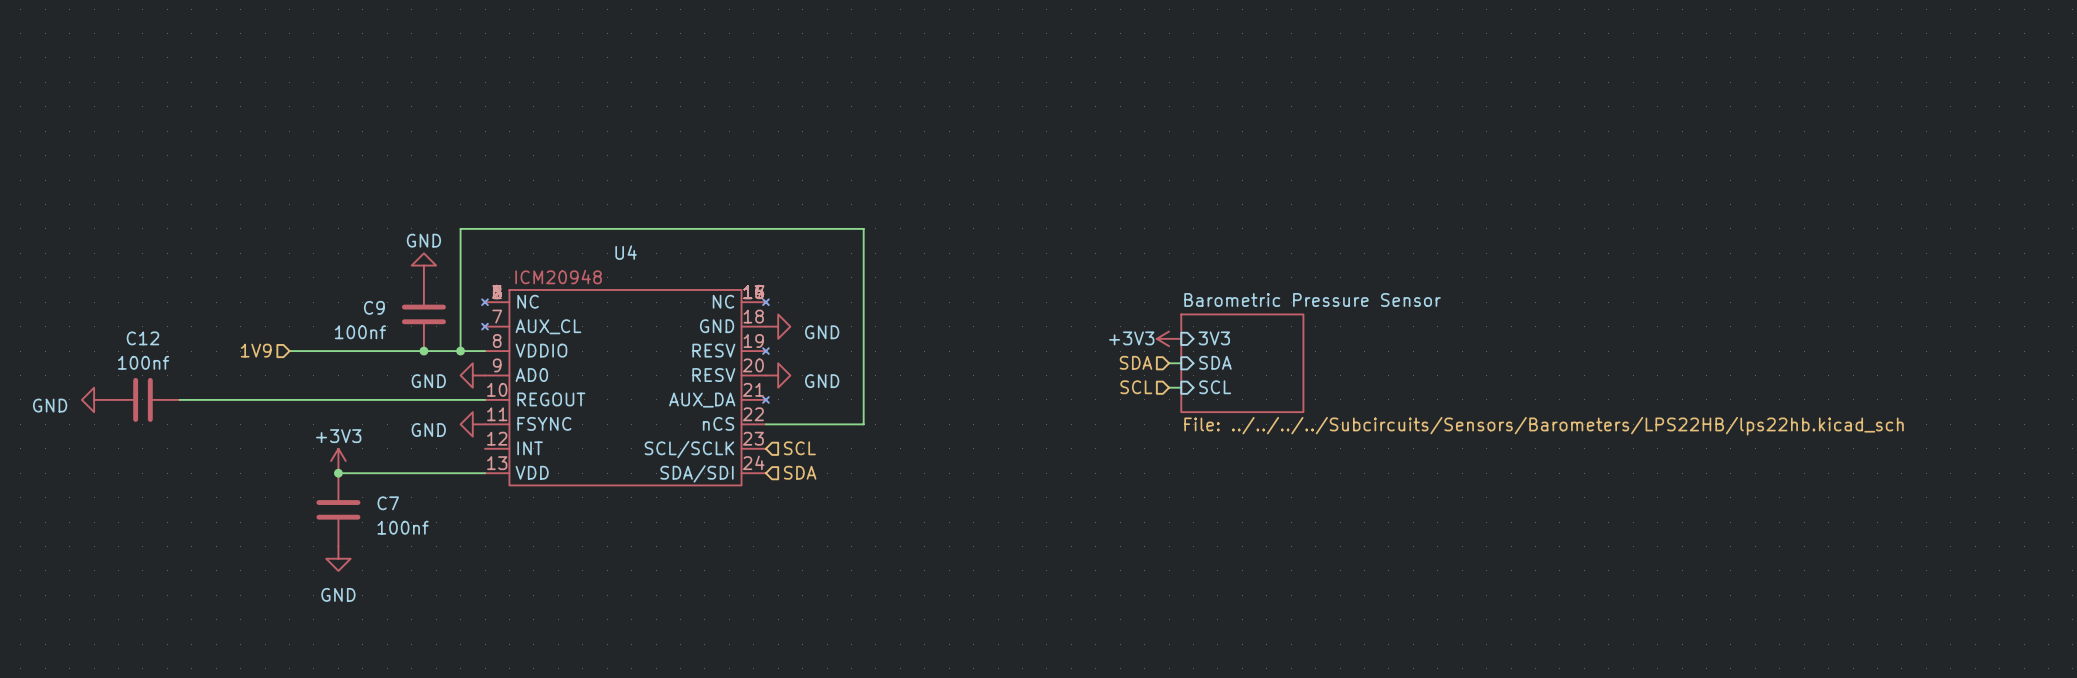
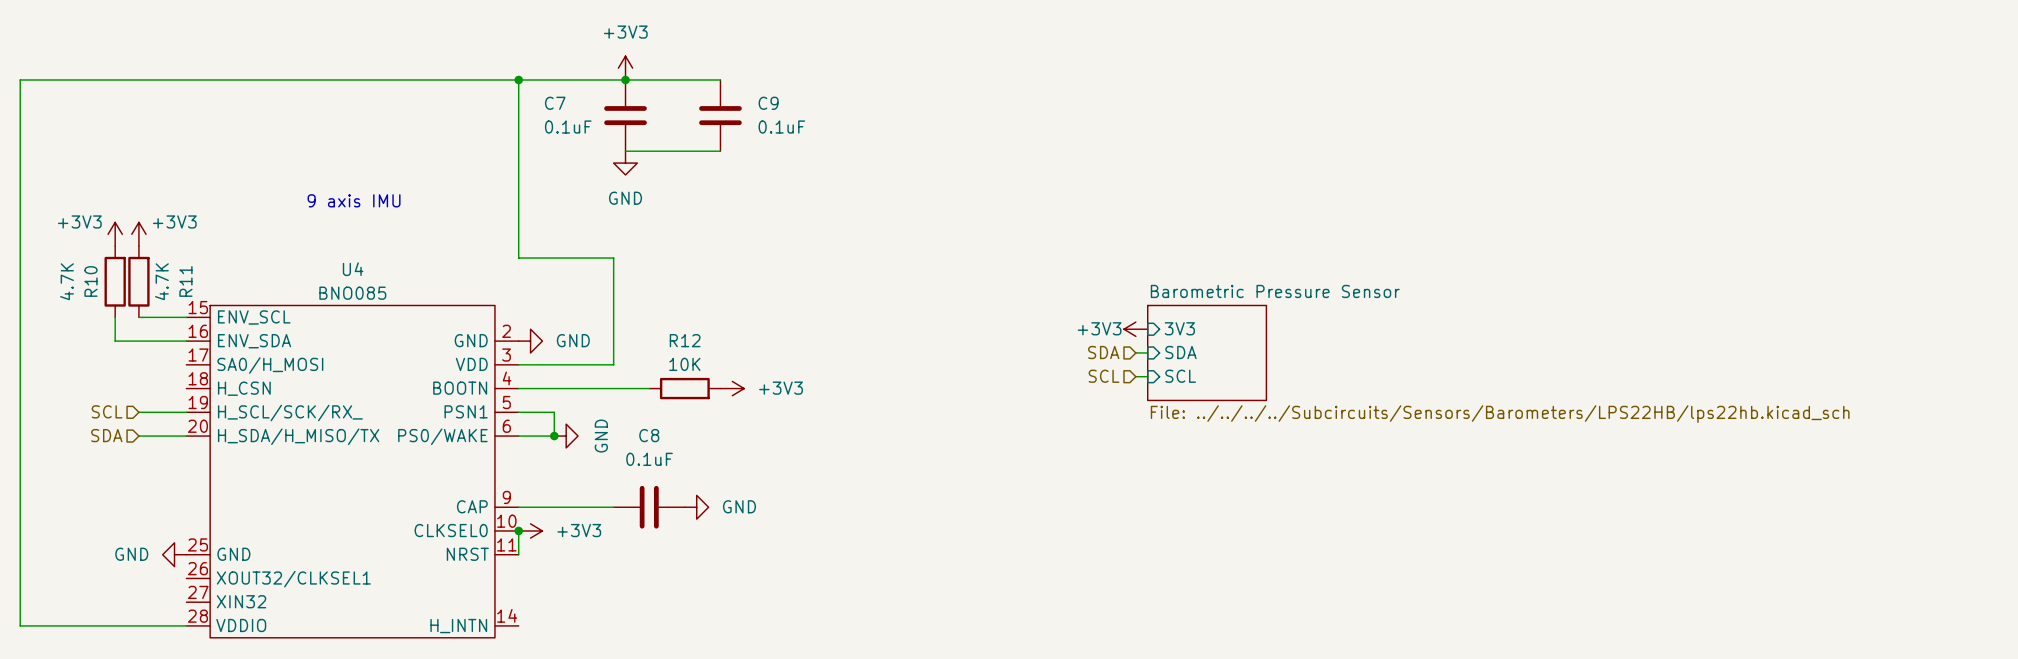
power symbol: none -> +3V3 (625, 68)
wire: none -> (518, 79) (518, 258) (613, 258) (613, 364) (518, 364)
junction: none -> (518, 79)
junction: none -> (625, 79)
wire: none -> (720, 79) (20, 79) (20, 625) (186, 625)
wire: none -> (625, 151) (720, 151)
power symbol: none -> GND (625, 163)
text: none -> 9 axis IMU (354, 200)
power symbol: none -> +3V3 (115, 234)
power symbol: none -> +3V3 (138, 234)
U4 name position: U4 (626, 252) -> U4 (353, 269)
power symbol: GND (423, 265) -> none
R10: none -> 4.7K (115, 281)
R11: none -> 4.7K (138, 281)
U4 symbol: [482, 289, 769, 486] -> [186, 305, 519, 638]
U4 value: none -> BNO085 (352, 293)
C9 name position: C9 (374, 307) -> C9 (768, 103)
C9 position: (423, 314) -> (720, 115)
wire: none -> (115, 317) (115, 341) (186, 341)
wire: none -> (138, 317) (186, 317)
power symbol: GND (778, 326) -> none
C9 value: 100nf (360, 332) -> 0.1uF (781, 127)
hierarchical label: 1V9 (256, 350) -> none
wire: (289, 351) (485, 351) -> none
junction: (423, 351) -> none
wire: (460, 351) (460, 228) (863, 228) (863, 424) (765, 424) -> none
junction: (460, 351) -> none
power symbol: none -> GND (530, 341)
power symbol: GND (472, 375) -> none
power symbol: GND (778, 375) -> none
power symbol: GND (94, 399) -> none
C12: 100nf (142, 399) -> none
wire: (179, 399) (485, 399) -> none
wire: none -> (518, 388) (649, 388)
R12: none -> 10K (684, 388)
power symbol: none -> +3V3 (732, 388)
hierarchical label: none -> SCL (107, 411)
wire: none -> (138, 412) (186, 412)
power symbol: GND (472, 424) -> none
wire: none -> (518, 412) (554, 412) (554, 436) (518, 436)
hierarchical label: none -> SDA (106, 435)
wire: none -> (138, 436) (186, 436)
junction: none -> (554, 436)
power symbol: none -> GND (566, 436)
hierarchical label: SCL (799, 448) -> none
power symbol: +3V3 (338, 461) -> none
hierarchical label: SDA (800, 472) -> none
wire: (338, 473) (485, 473) -> none
junction: (338, 473) -> none
C7 name position: C7 (388, 503) -> C7 (555, 103)
C7 position: (338, 509) -> (625, 115)
wire: none -> (518, 507) (613, 507)
C8: none -> 0.1uF (649, 507)
power symbol: none -> GND (696, 507)
C7 value: 100nf (403, 527) -> 0.1uF (568, 127)
wire: none -> (518, 530) (518, 554)
junction: none -> (518, 530)
power symbol: none -> +3V3 (530, 530)
power symbol: GND (338, 558) -> none
power symbol: none -> GND (174, 554)

